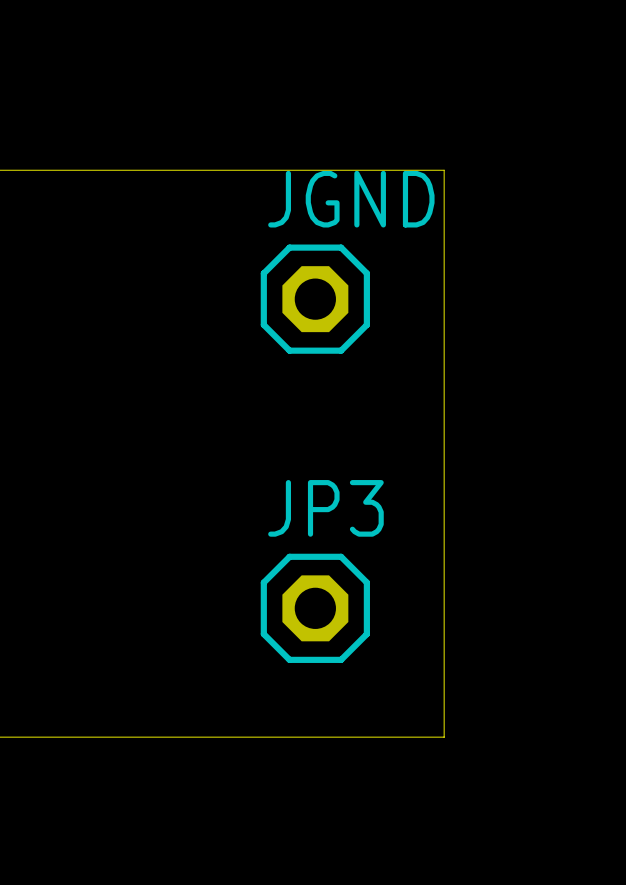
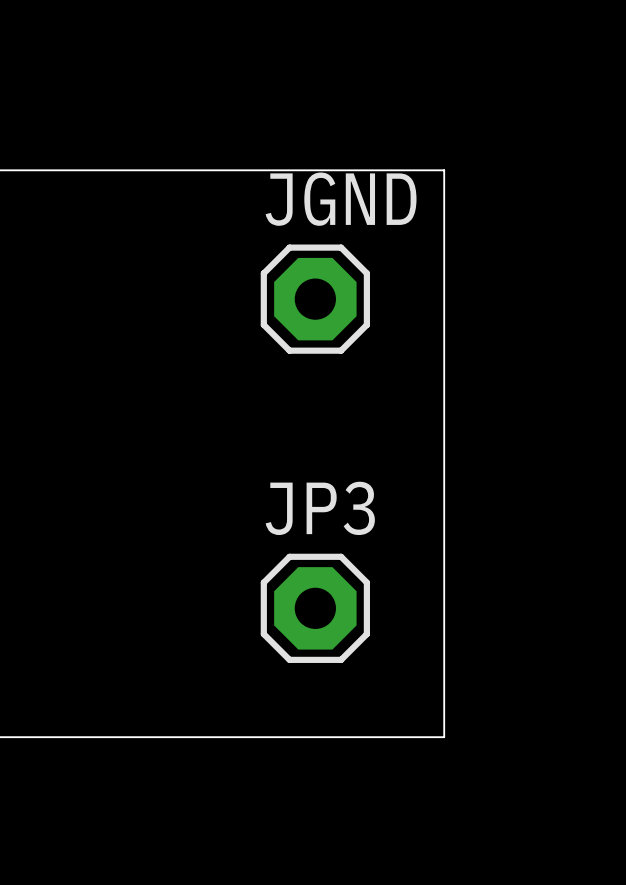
JGND footprint: [260, 244, 370, 354] -> [260, 244, 370, 354]
JP3 footprint: [260, 553, 370, 663] -> [260, 553, 370, 663]

